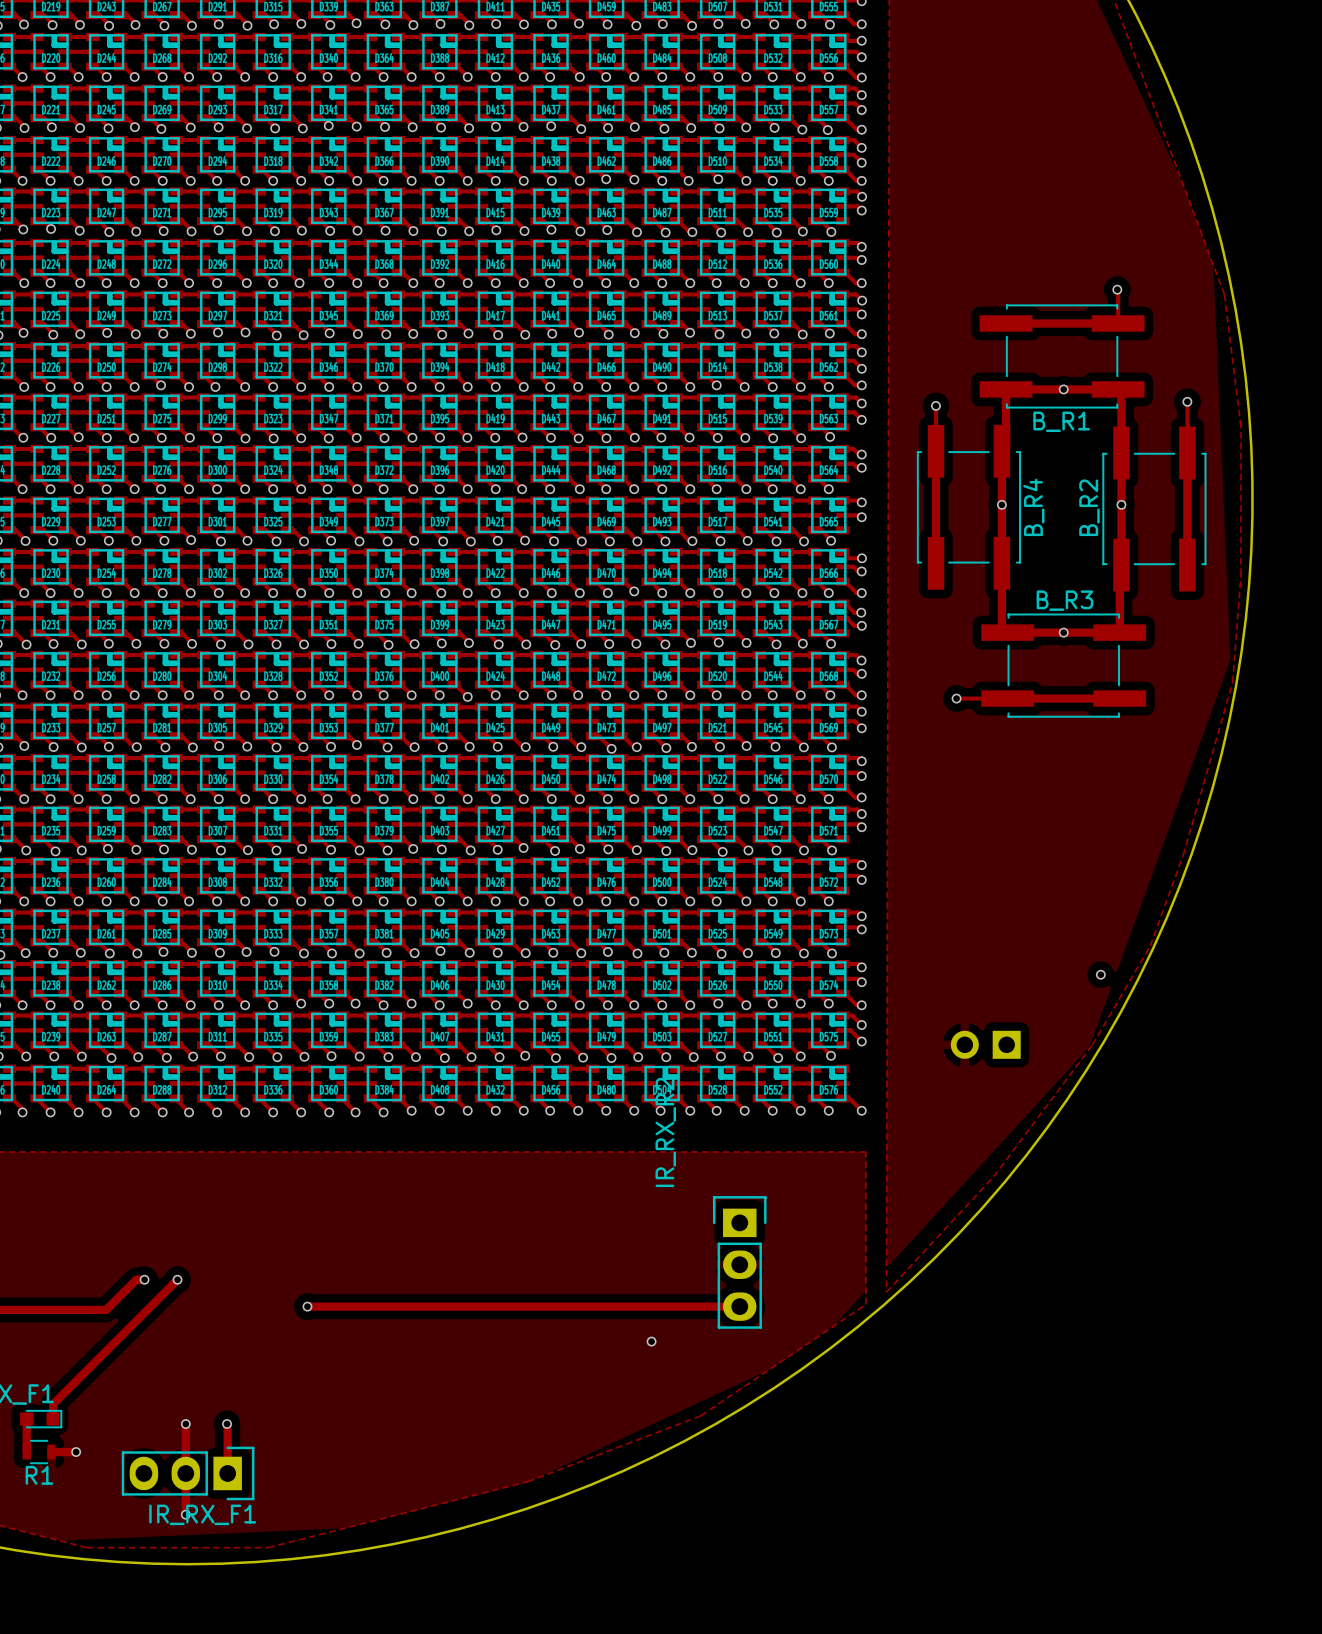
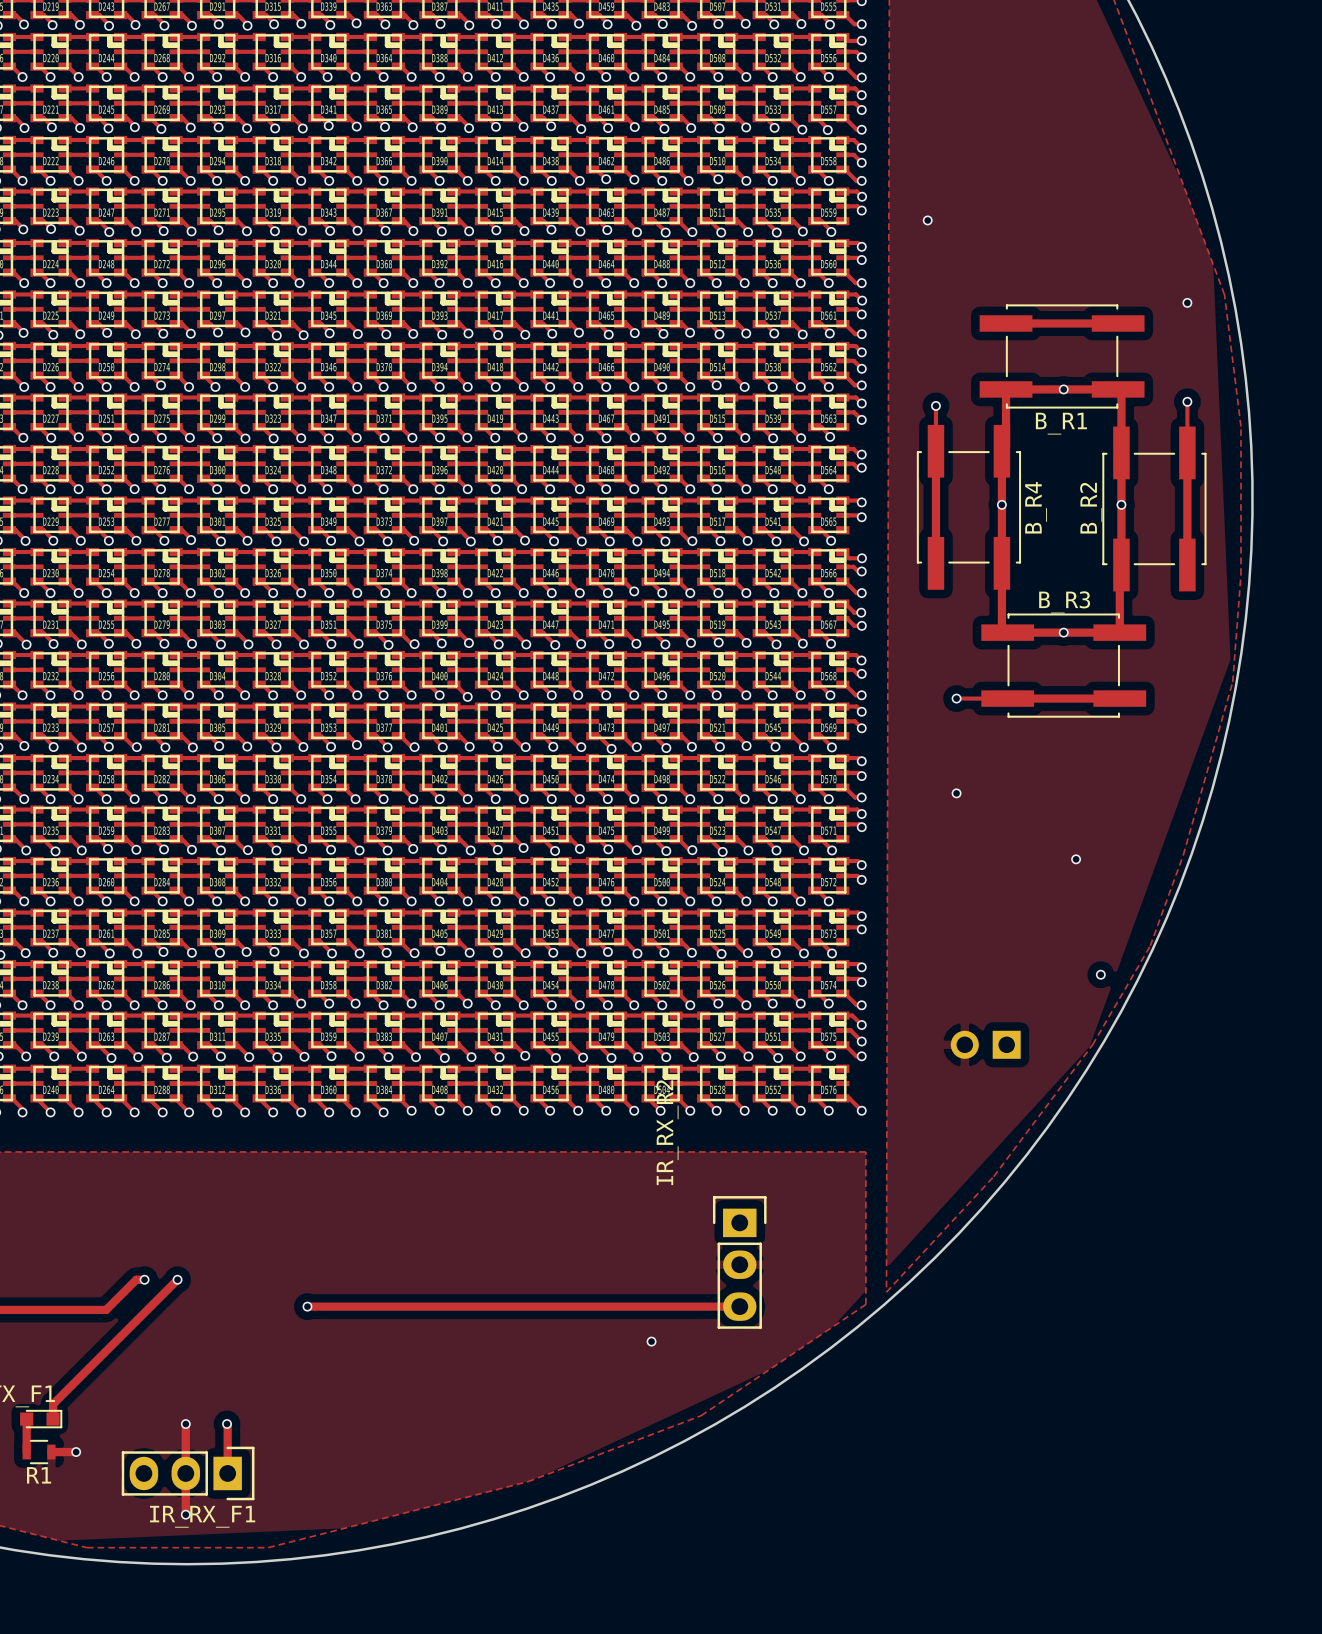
via: none -> (927, 220)
track: (1117, 289) (1118, 323) -> none
via position: (1117, 289) -> (1187, 302)
via: none -> (956, 793)
via: none -> (1076, 859)
track: none -> (845, 1045) (856, 1056) (861, 1056)
via: none -> (861, 1056)

